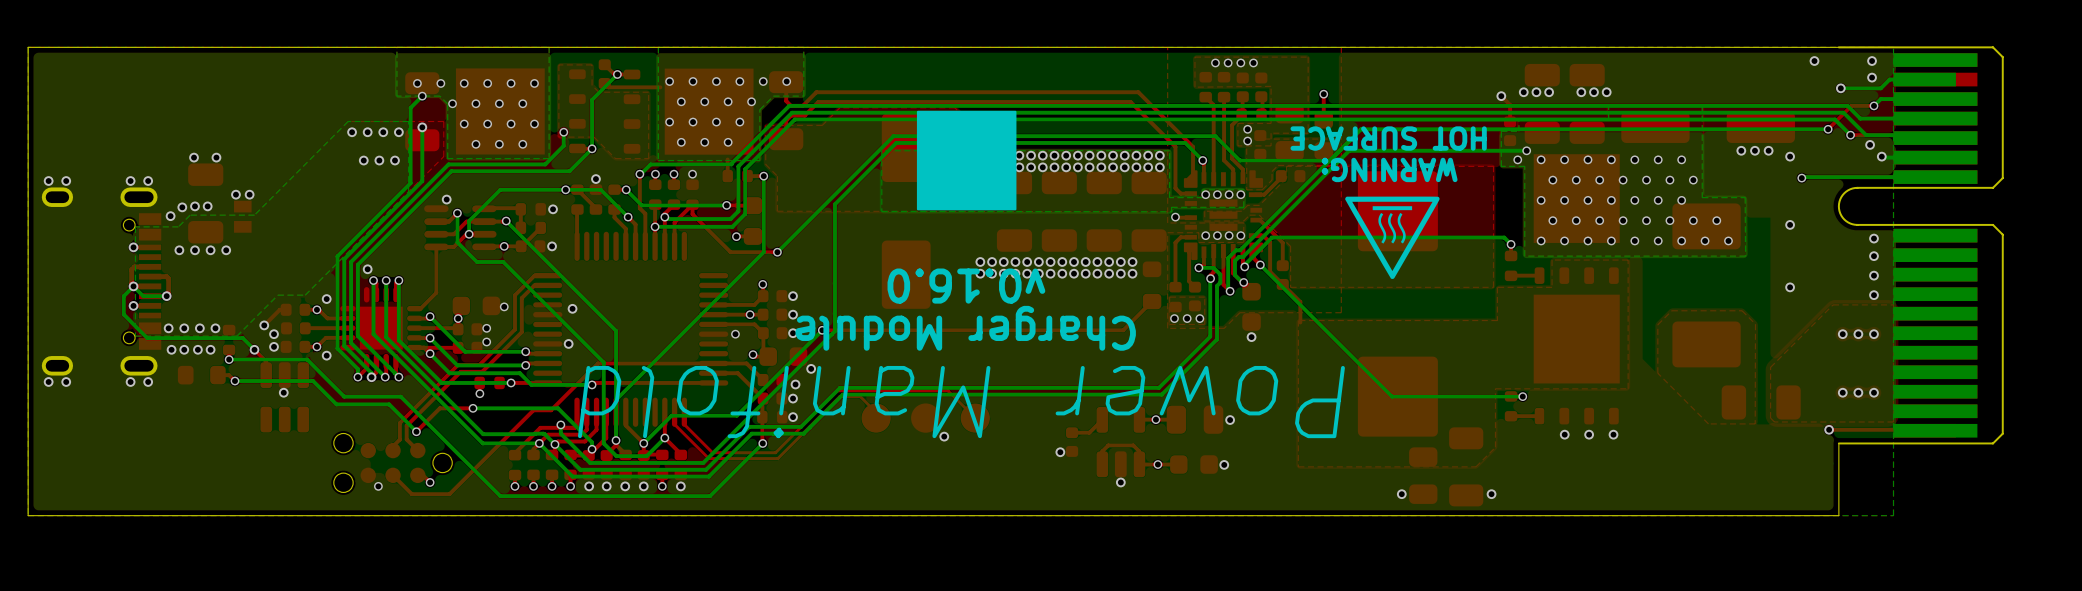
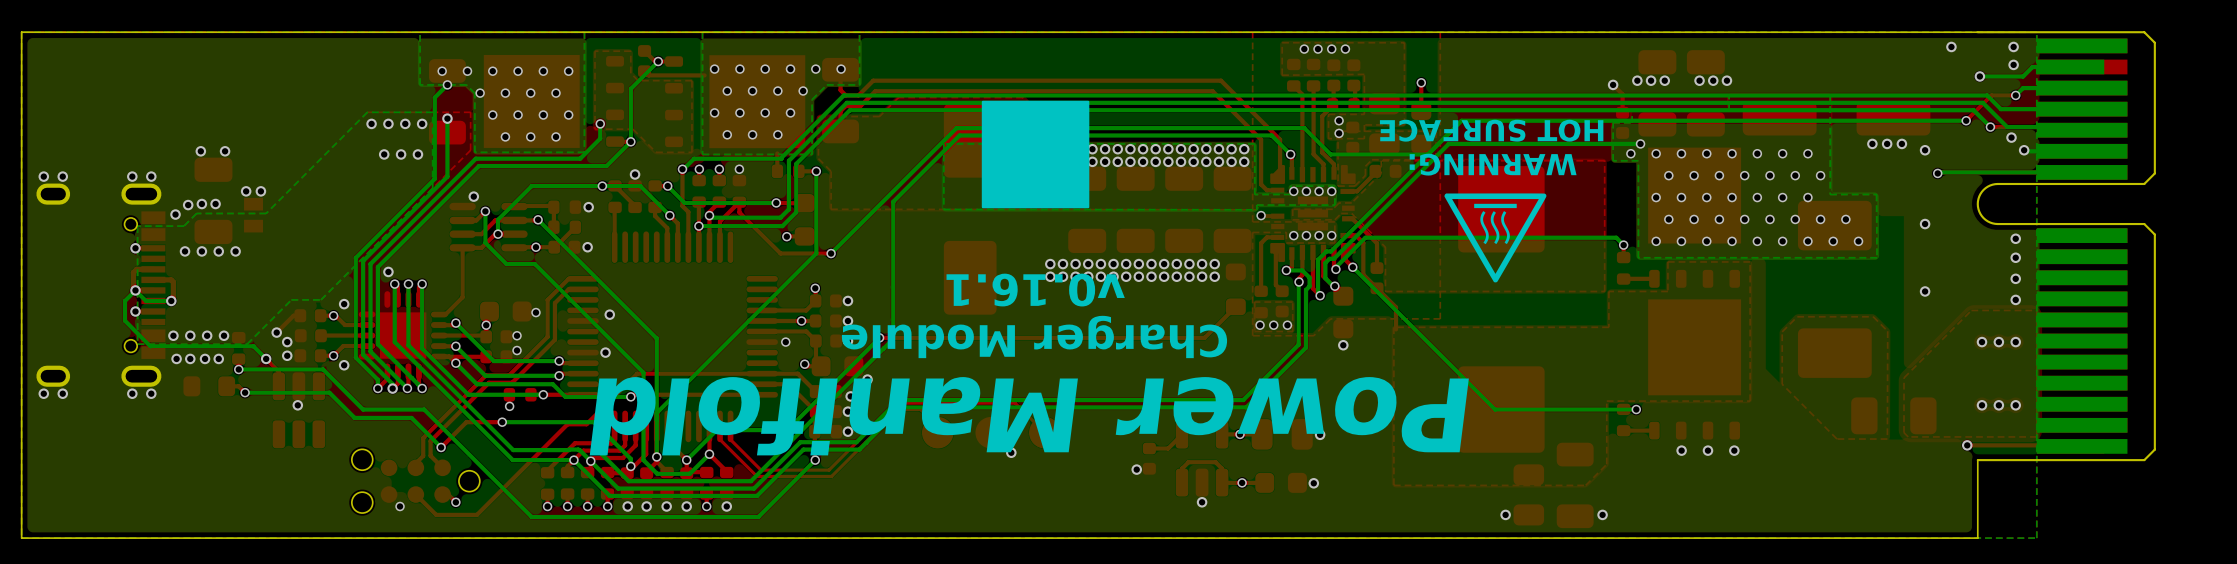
text: v0.16.0 (966, 286) -> v0.16.1 (1035, 290)

